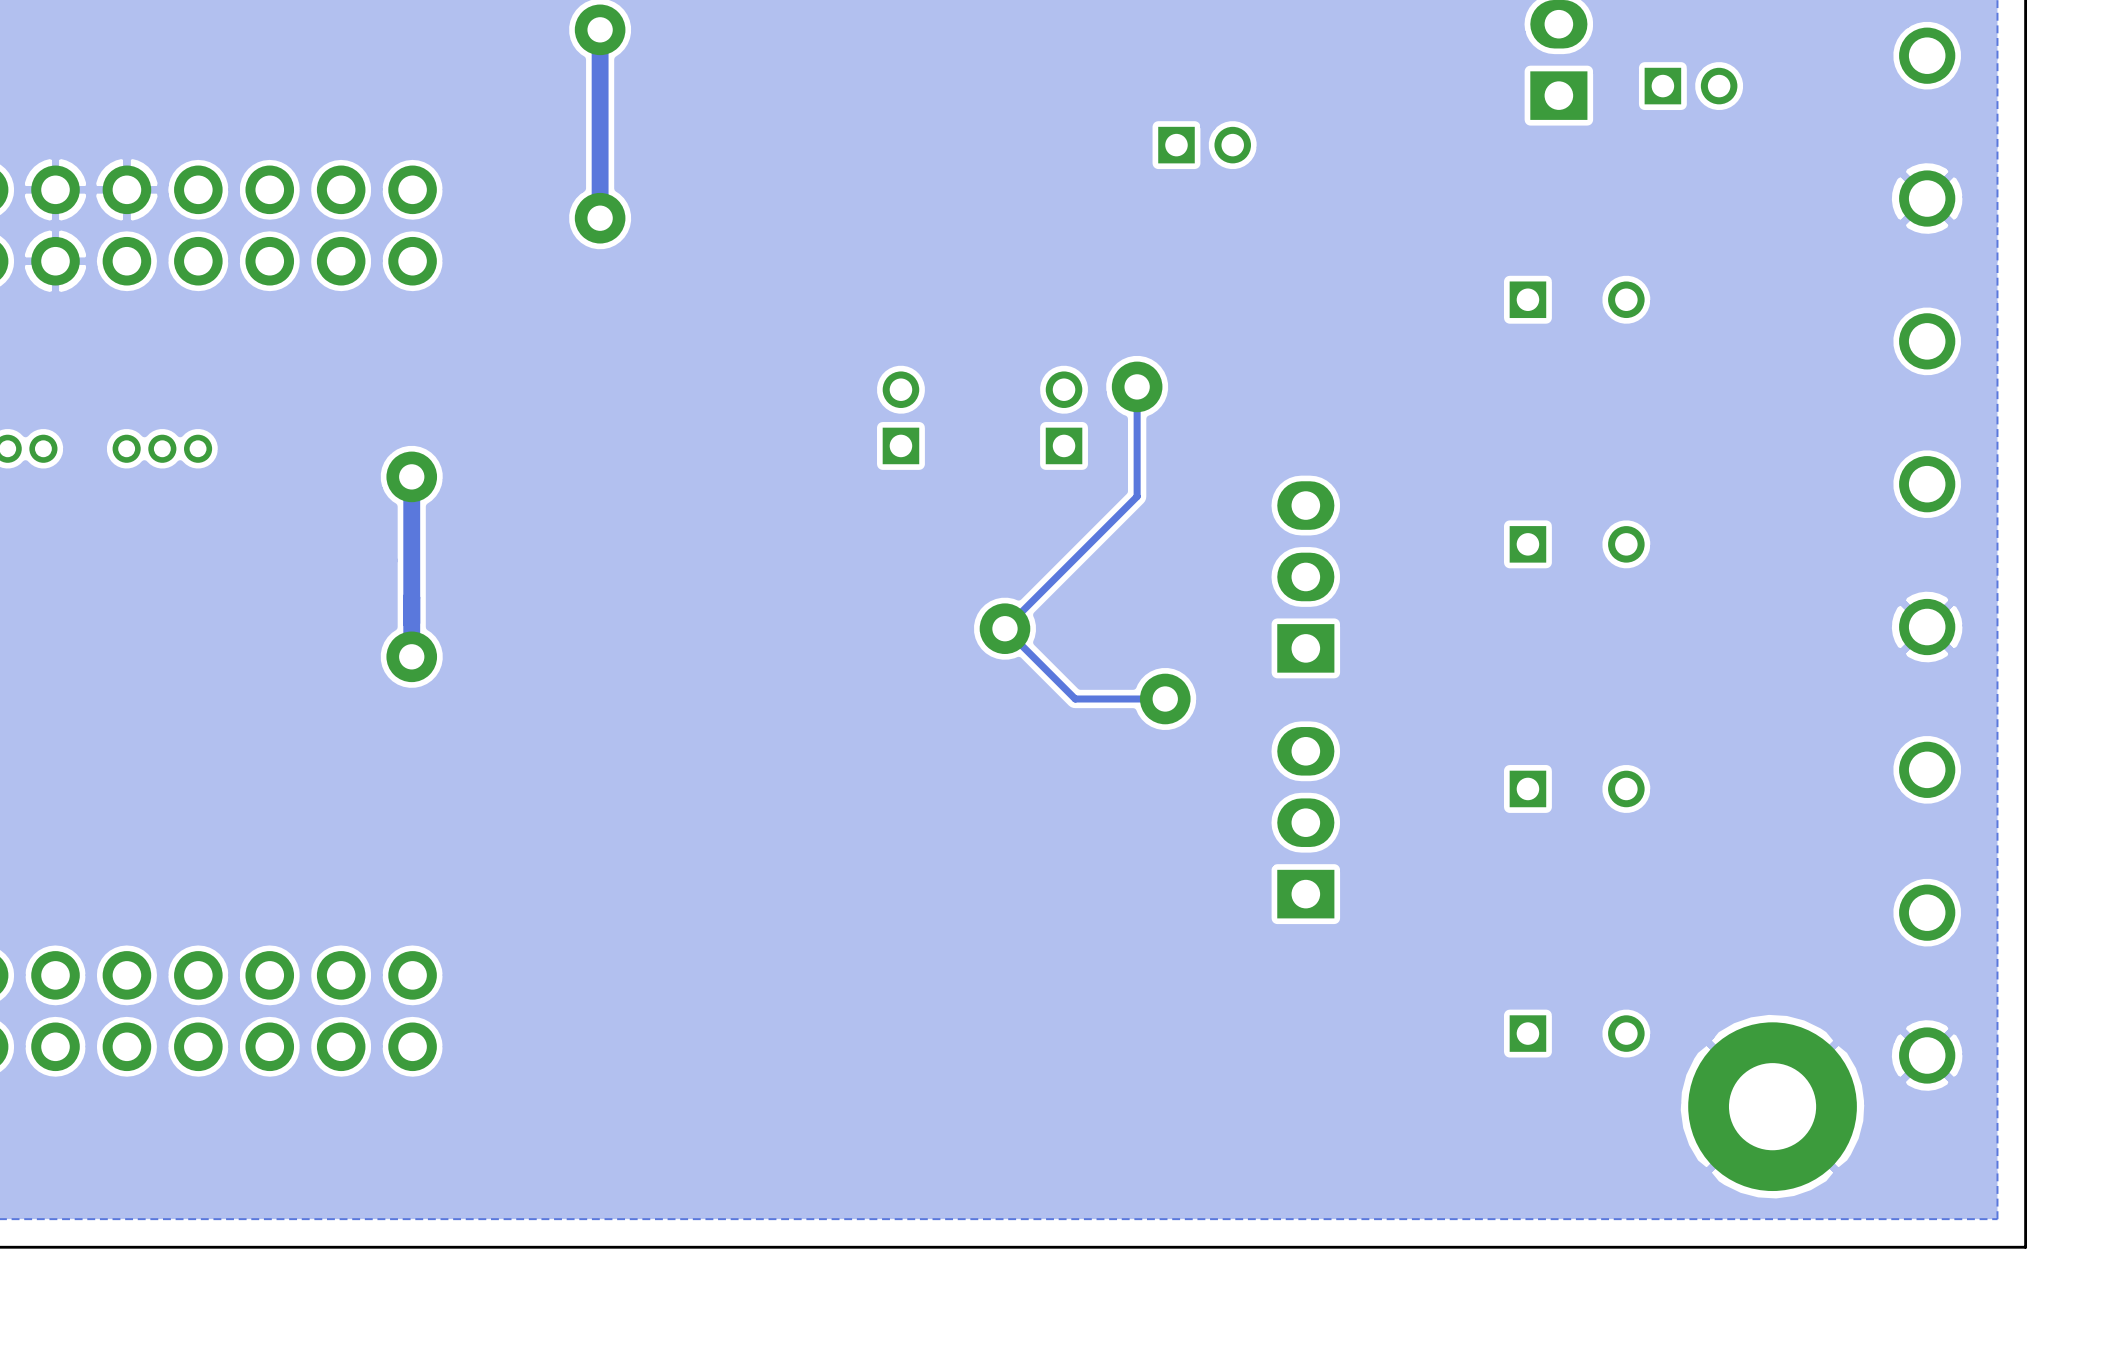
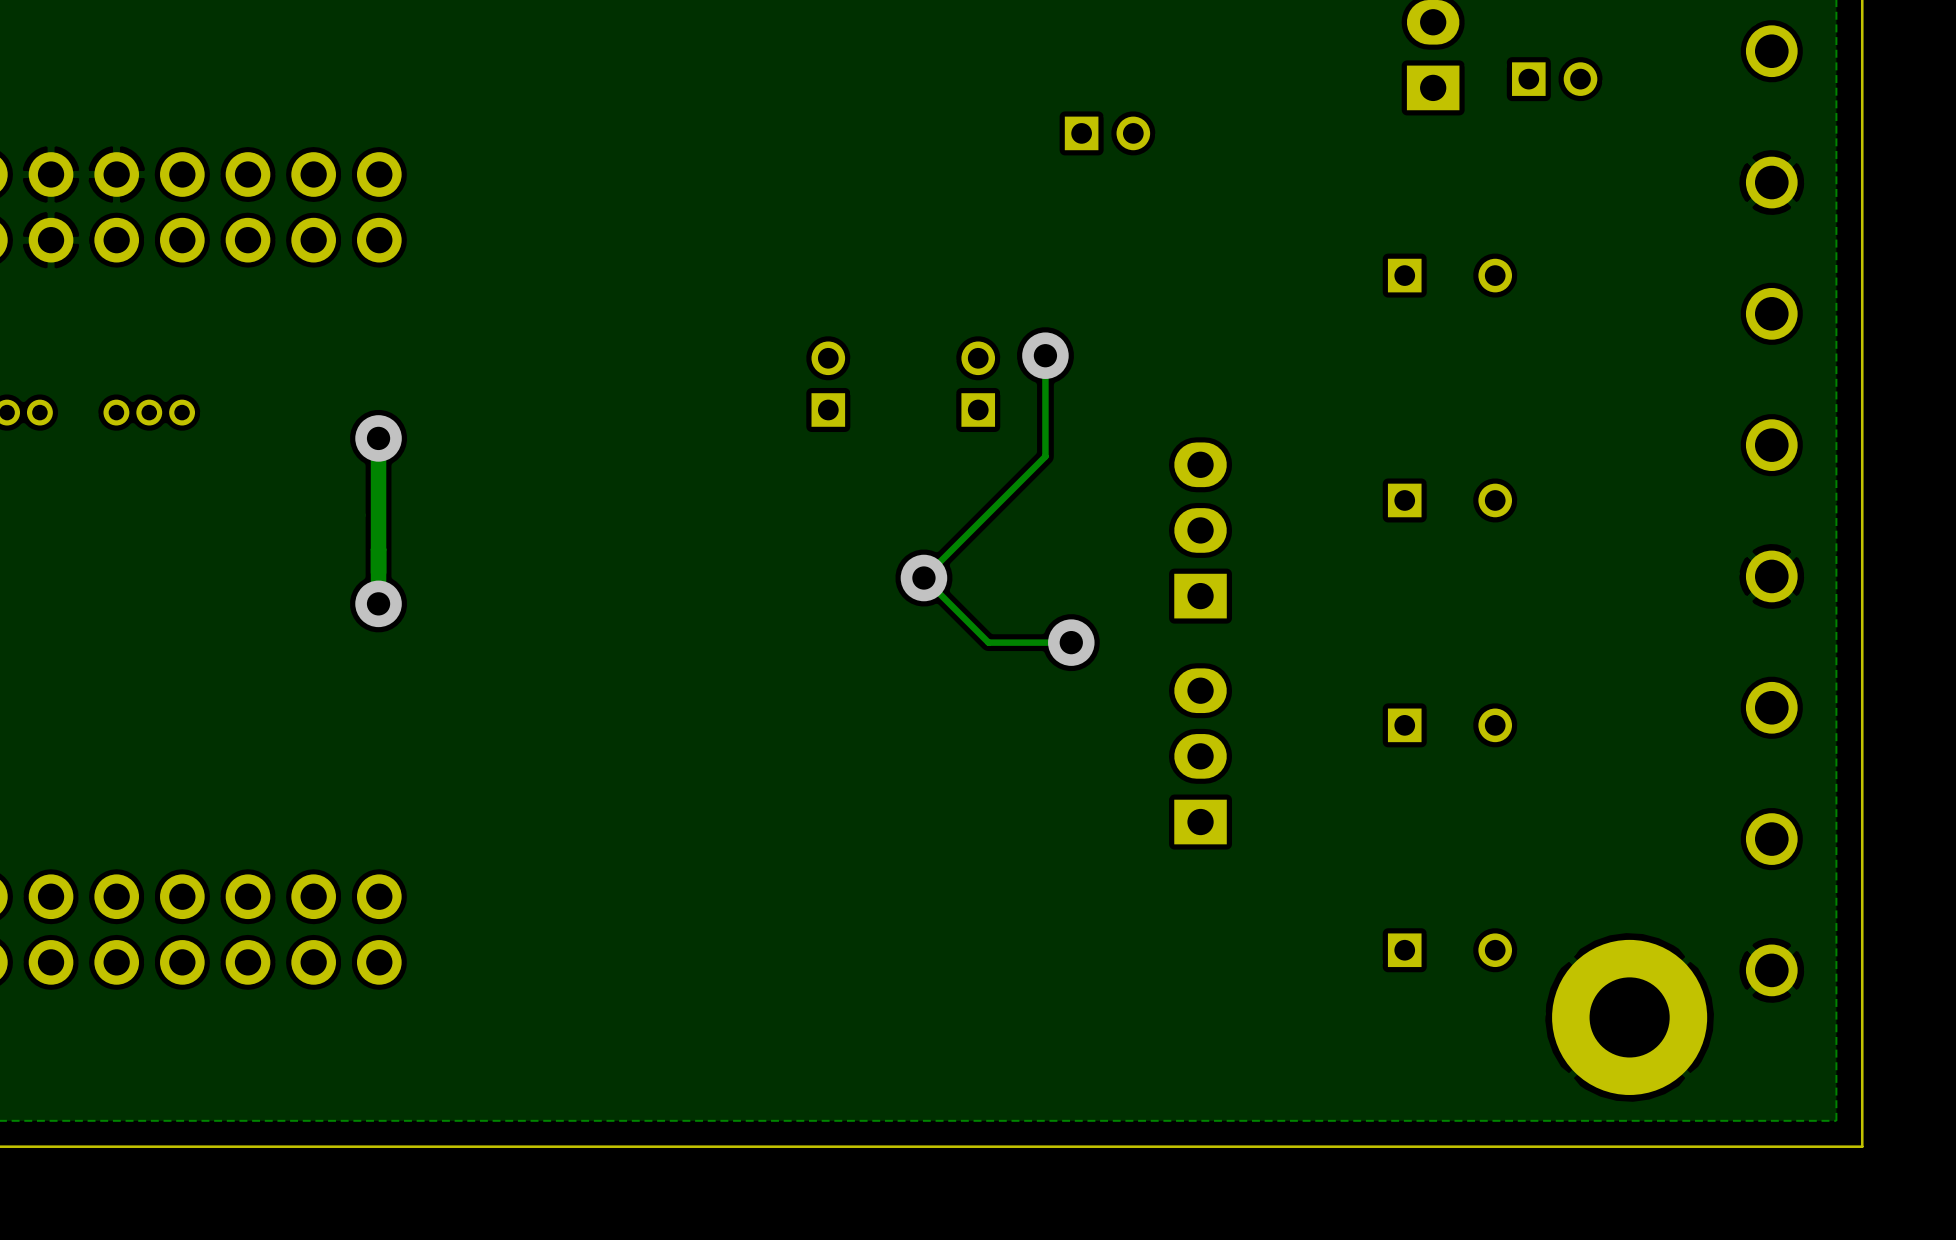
track: (600, 29) (600, 218) -> none
via: (600, 29) -> none
via: (600, 218) -> none

